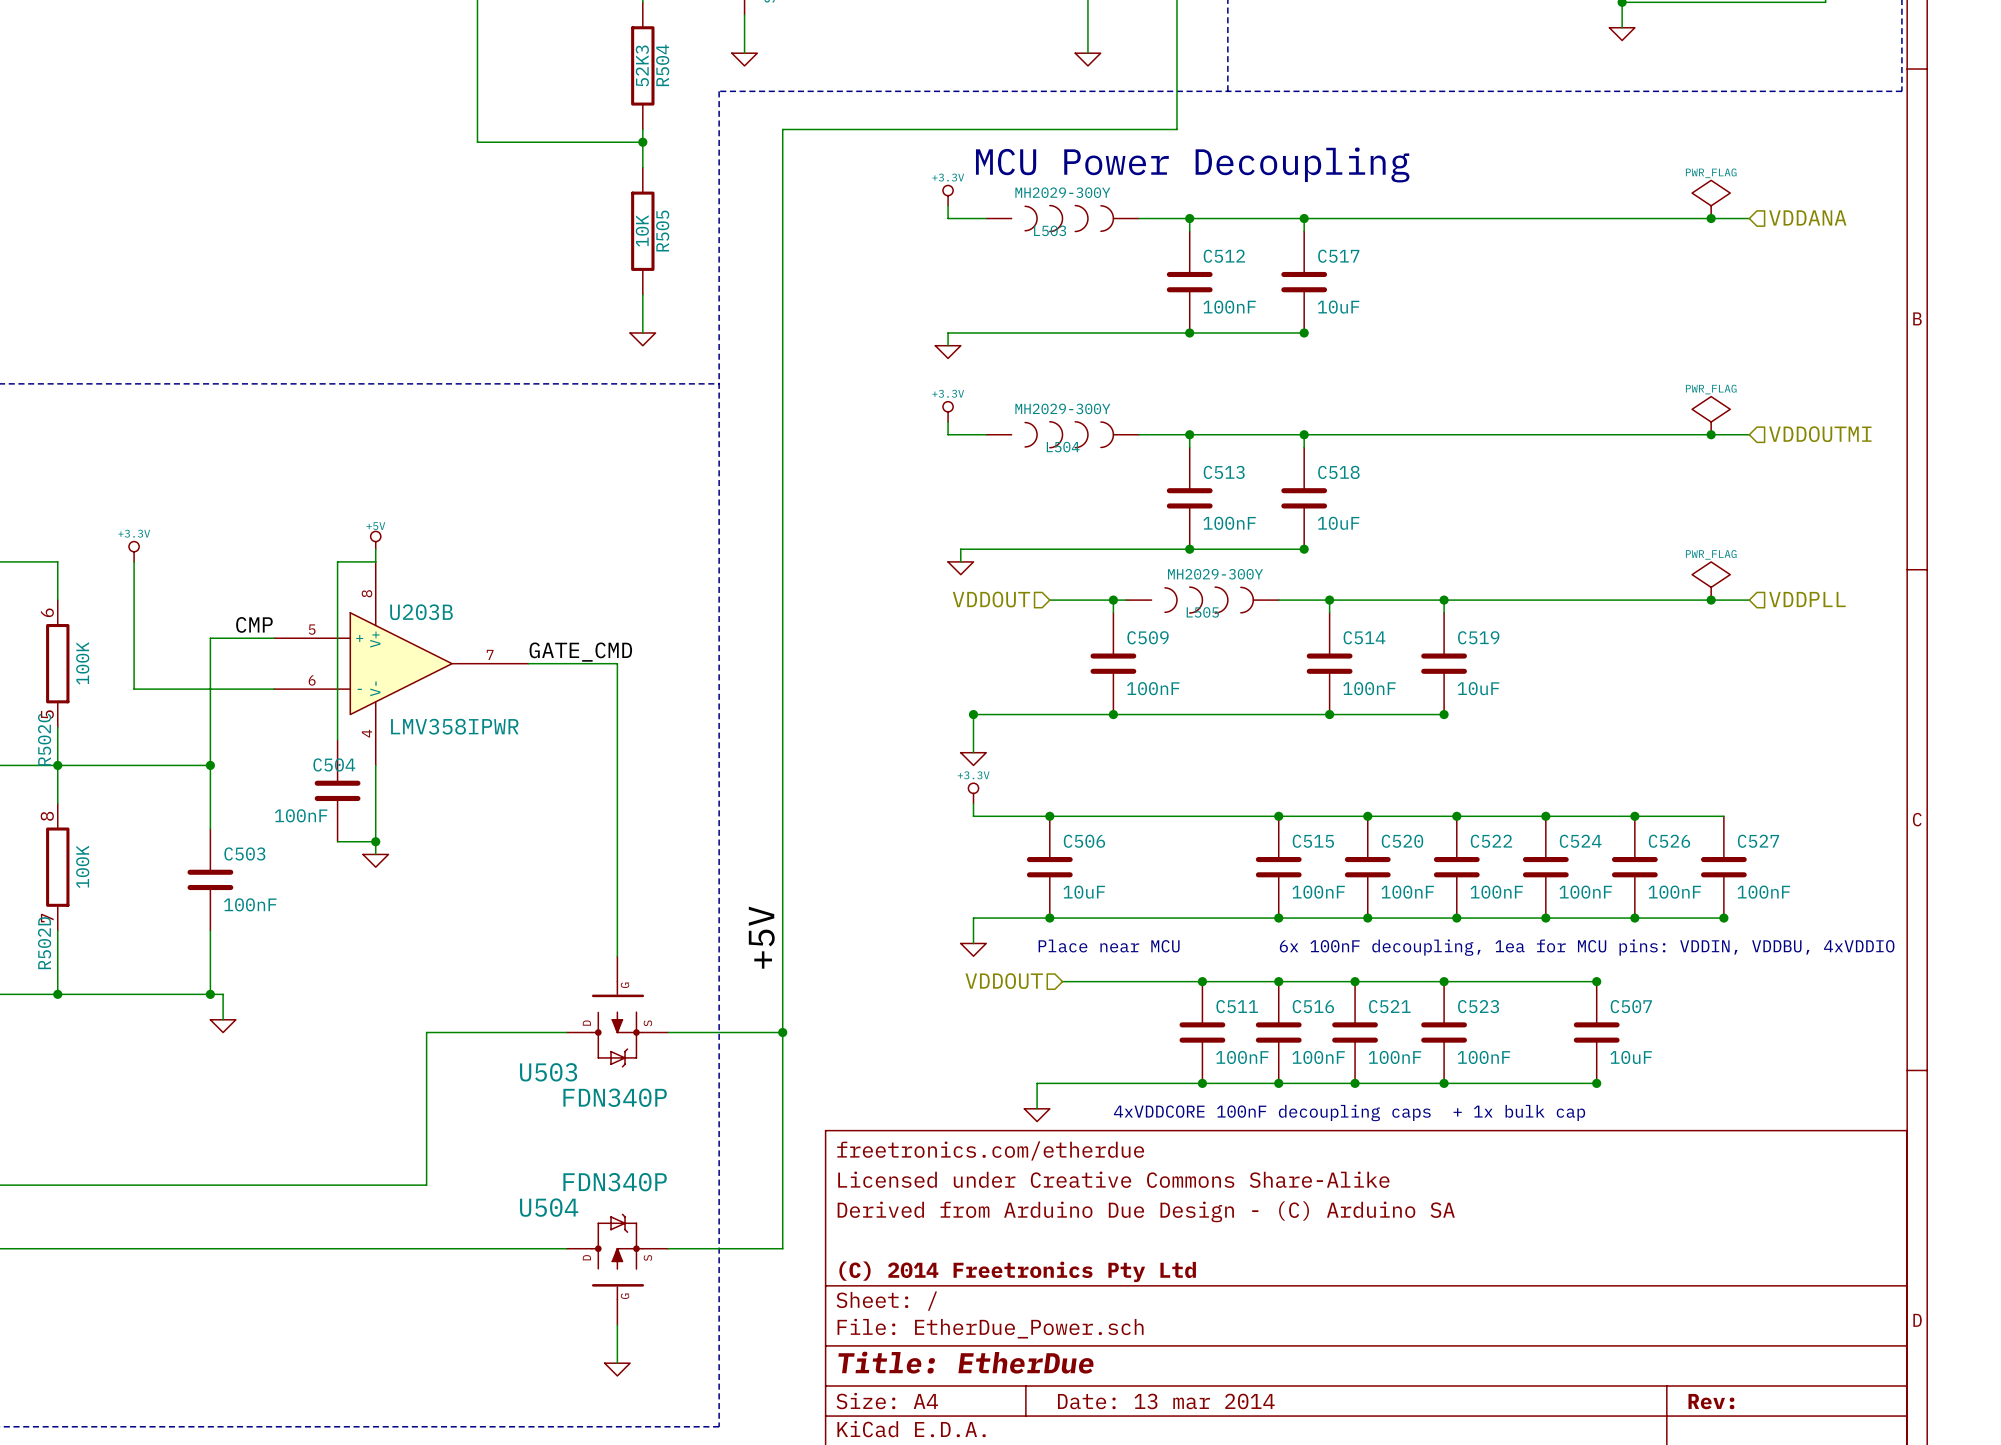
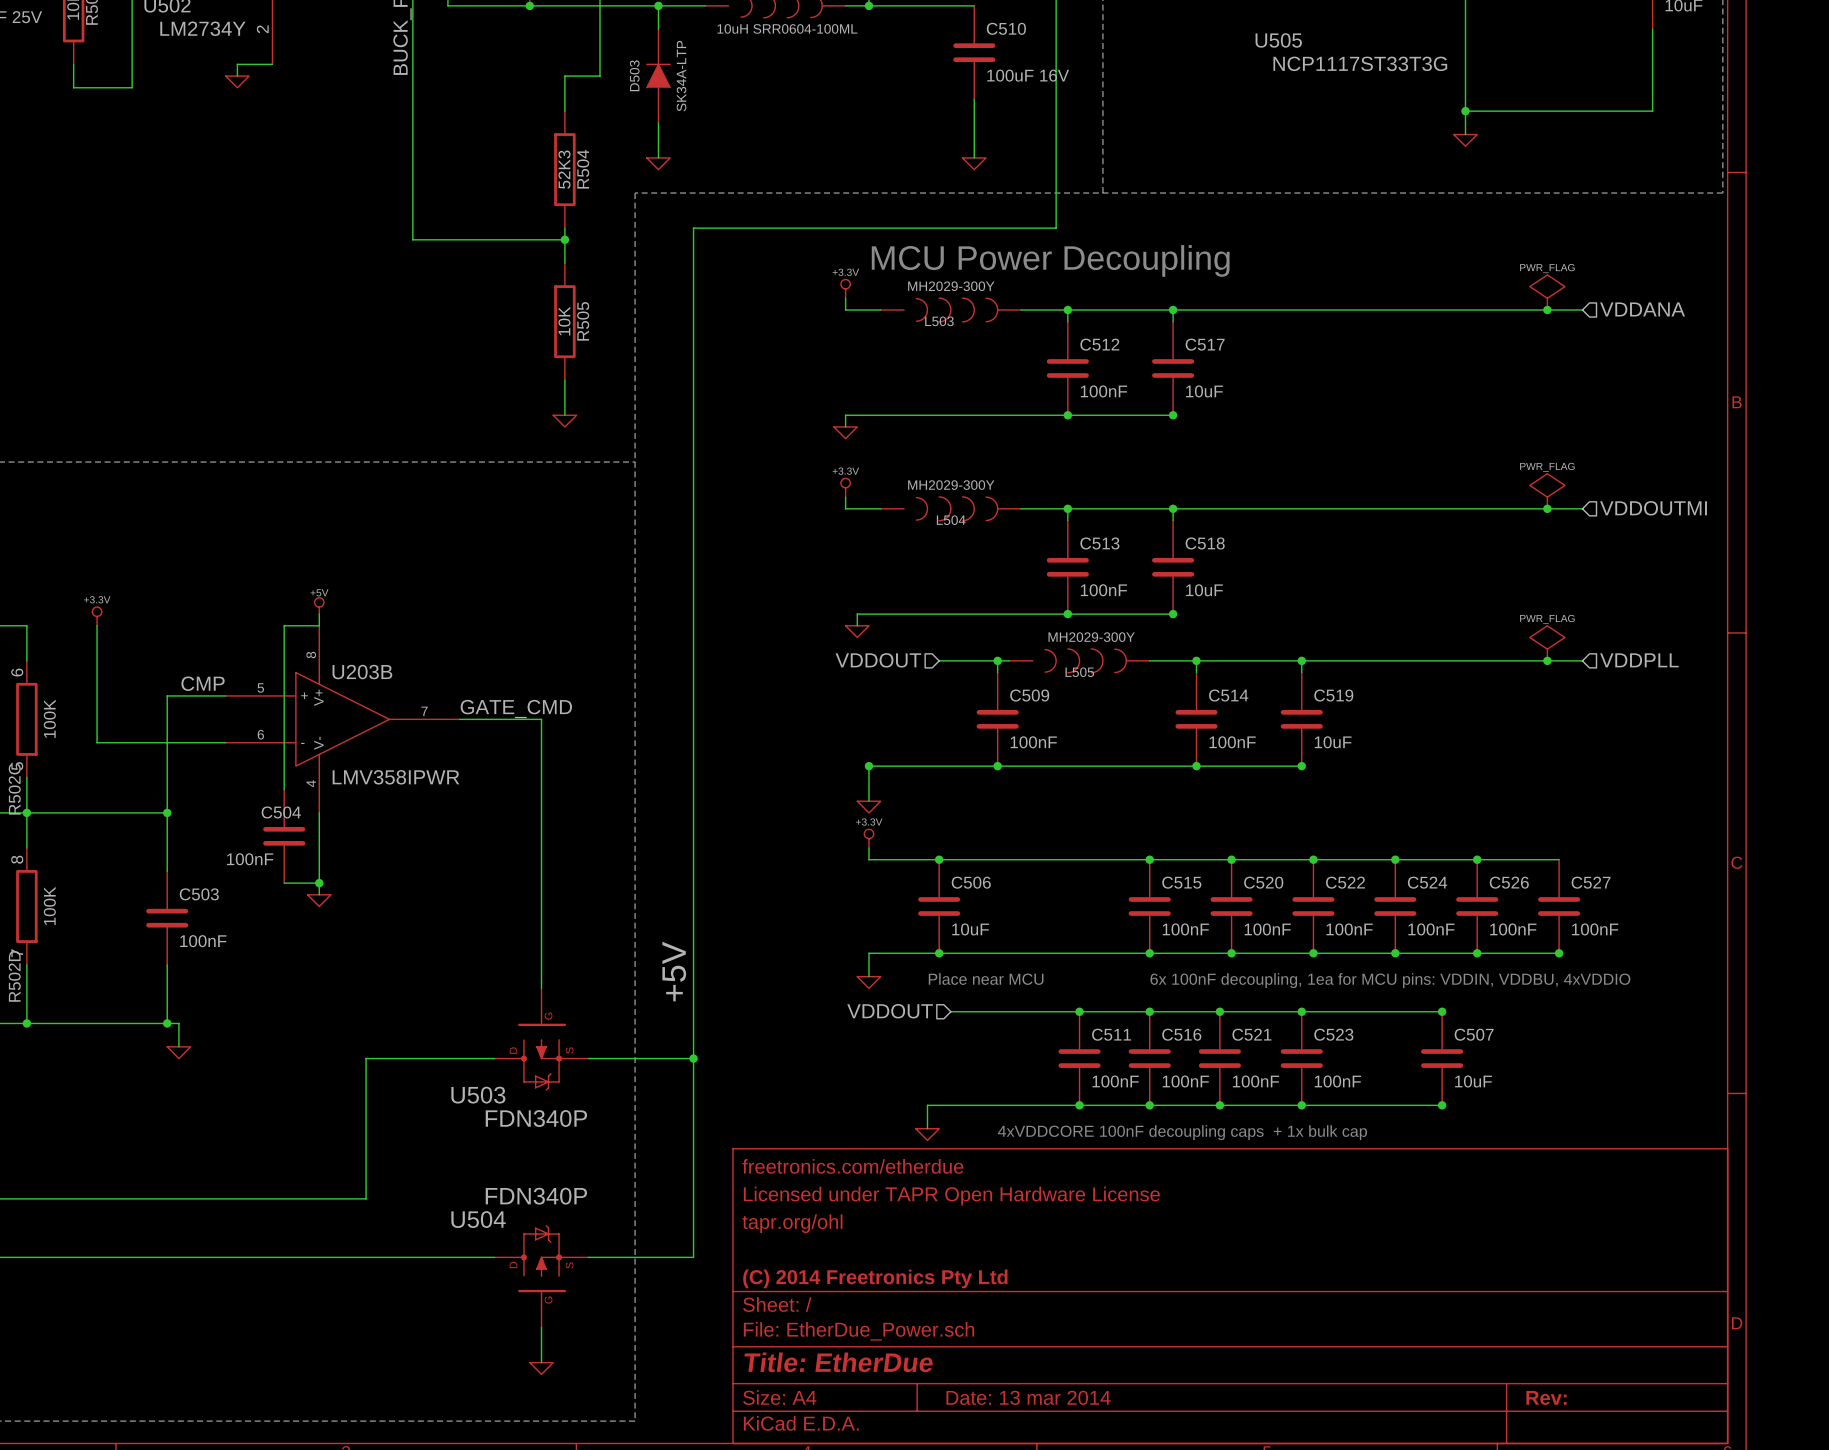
title block: Licensed under Creative Commons Share-Alike (1113, 1179) -> Licensed under TAPR Open Hardware License (951, 1196)
title block: Derived from Arduino Due Design - (C) Arduino SA (1146, 1211) -> tapr.org/ohl (792, 1223)

